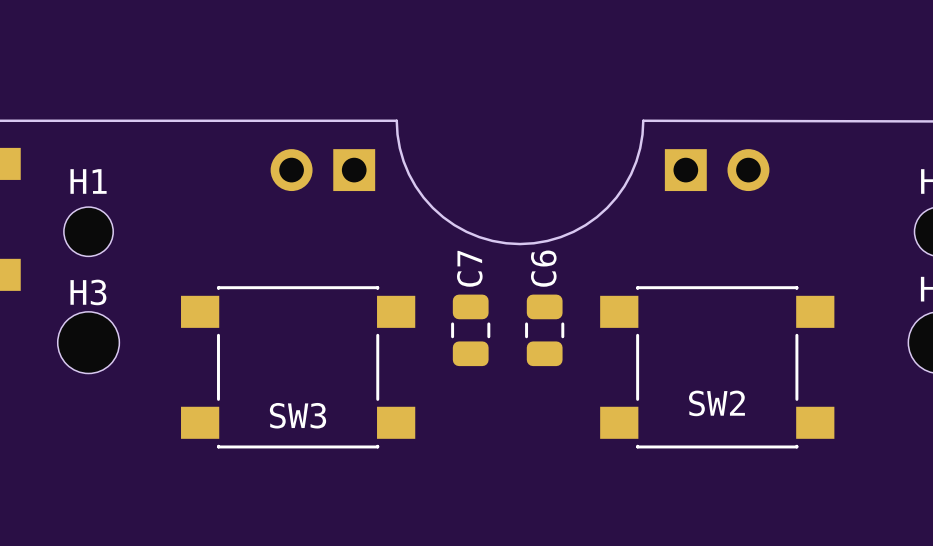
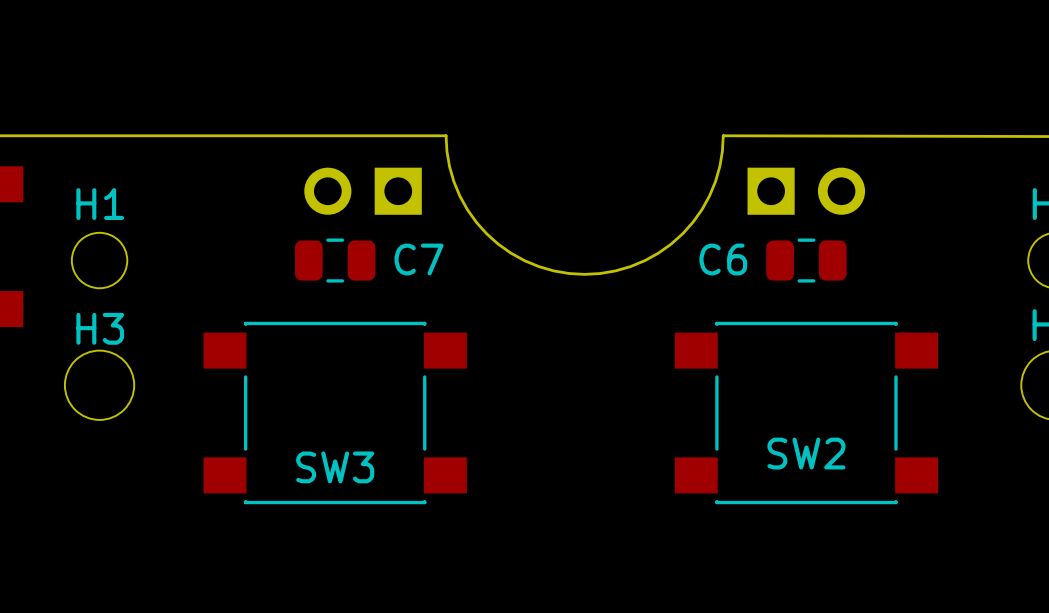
C6 name position: C6 (543, 268) -> C6 (723, 259)
C7 rotation: 0° (470, 330) -> 90° clockwise (335, 260)
C7 position: (470, 330) -> (335, 260)
C6 rotation: 0° (544, 330) -> 90° clockwise (806, 260)
C6 position: (544, 330) -> (806, 260)

